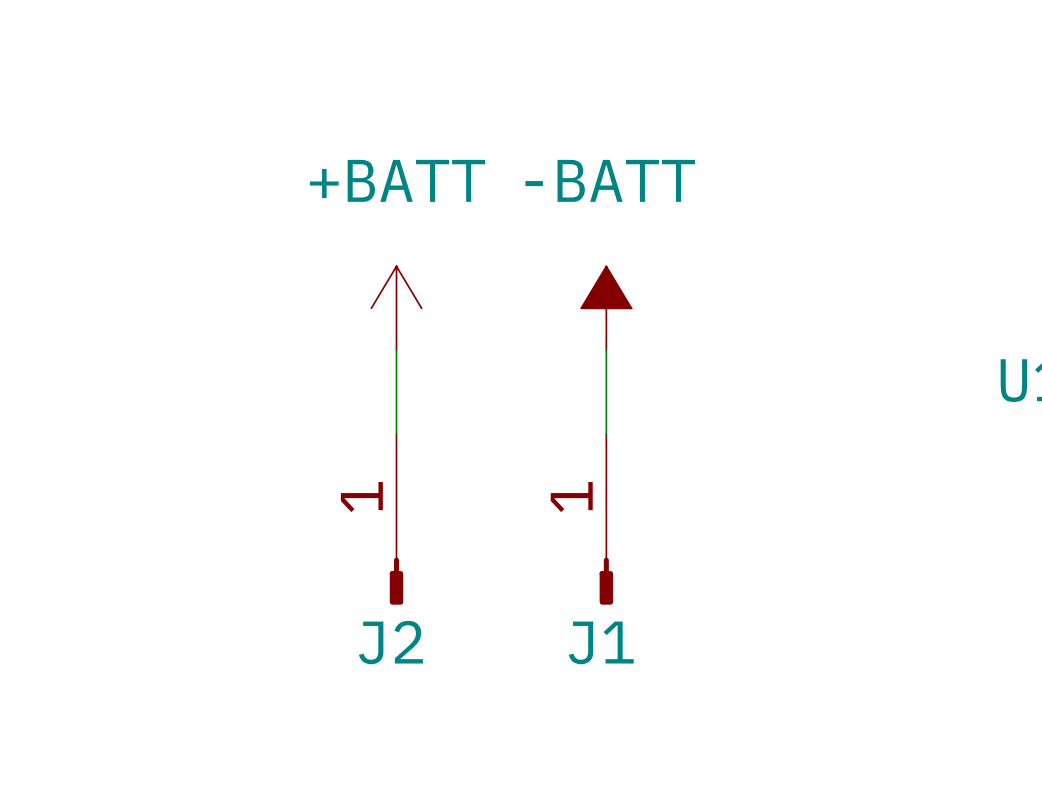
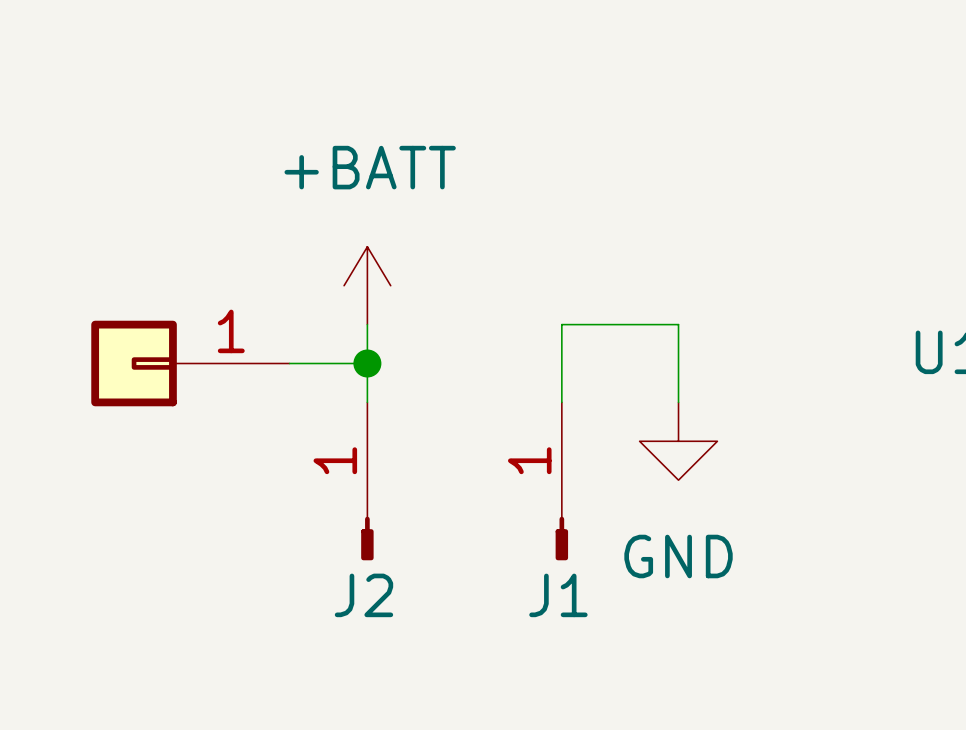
power symbol: -BATT (606, 308) -> none
wire: none -> (561, 324) (678, 324) (678, 402)
part: none -> (190, 363)
wire: none -> (289, 363) (367, 363)
junction: none -> (367, 363)
power symbol: none -> GND (678, 441)

